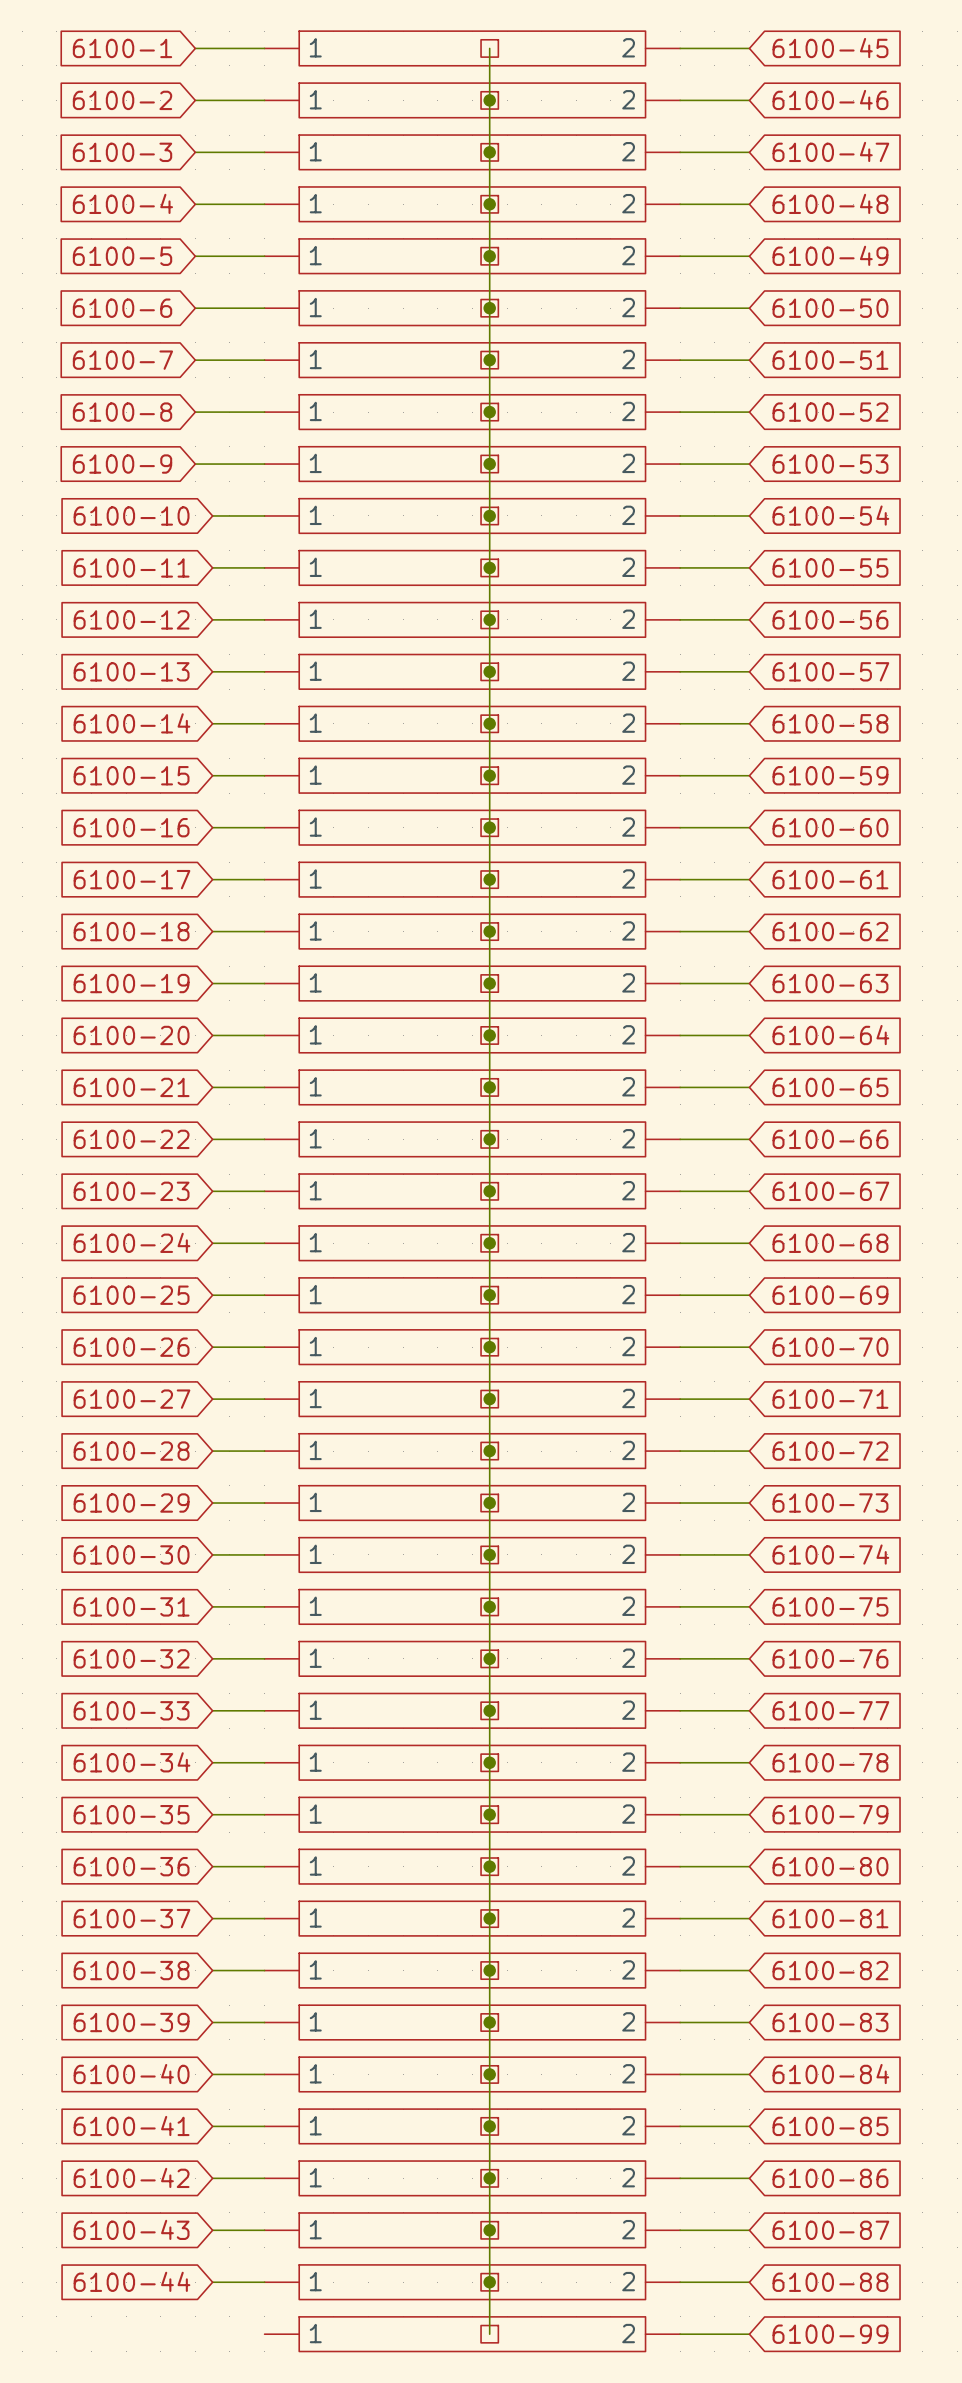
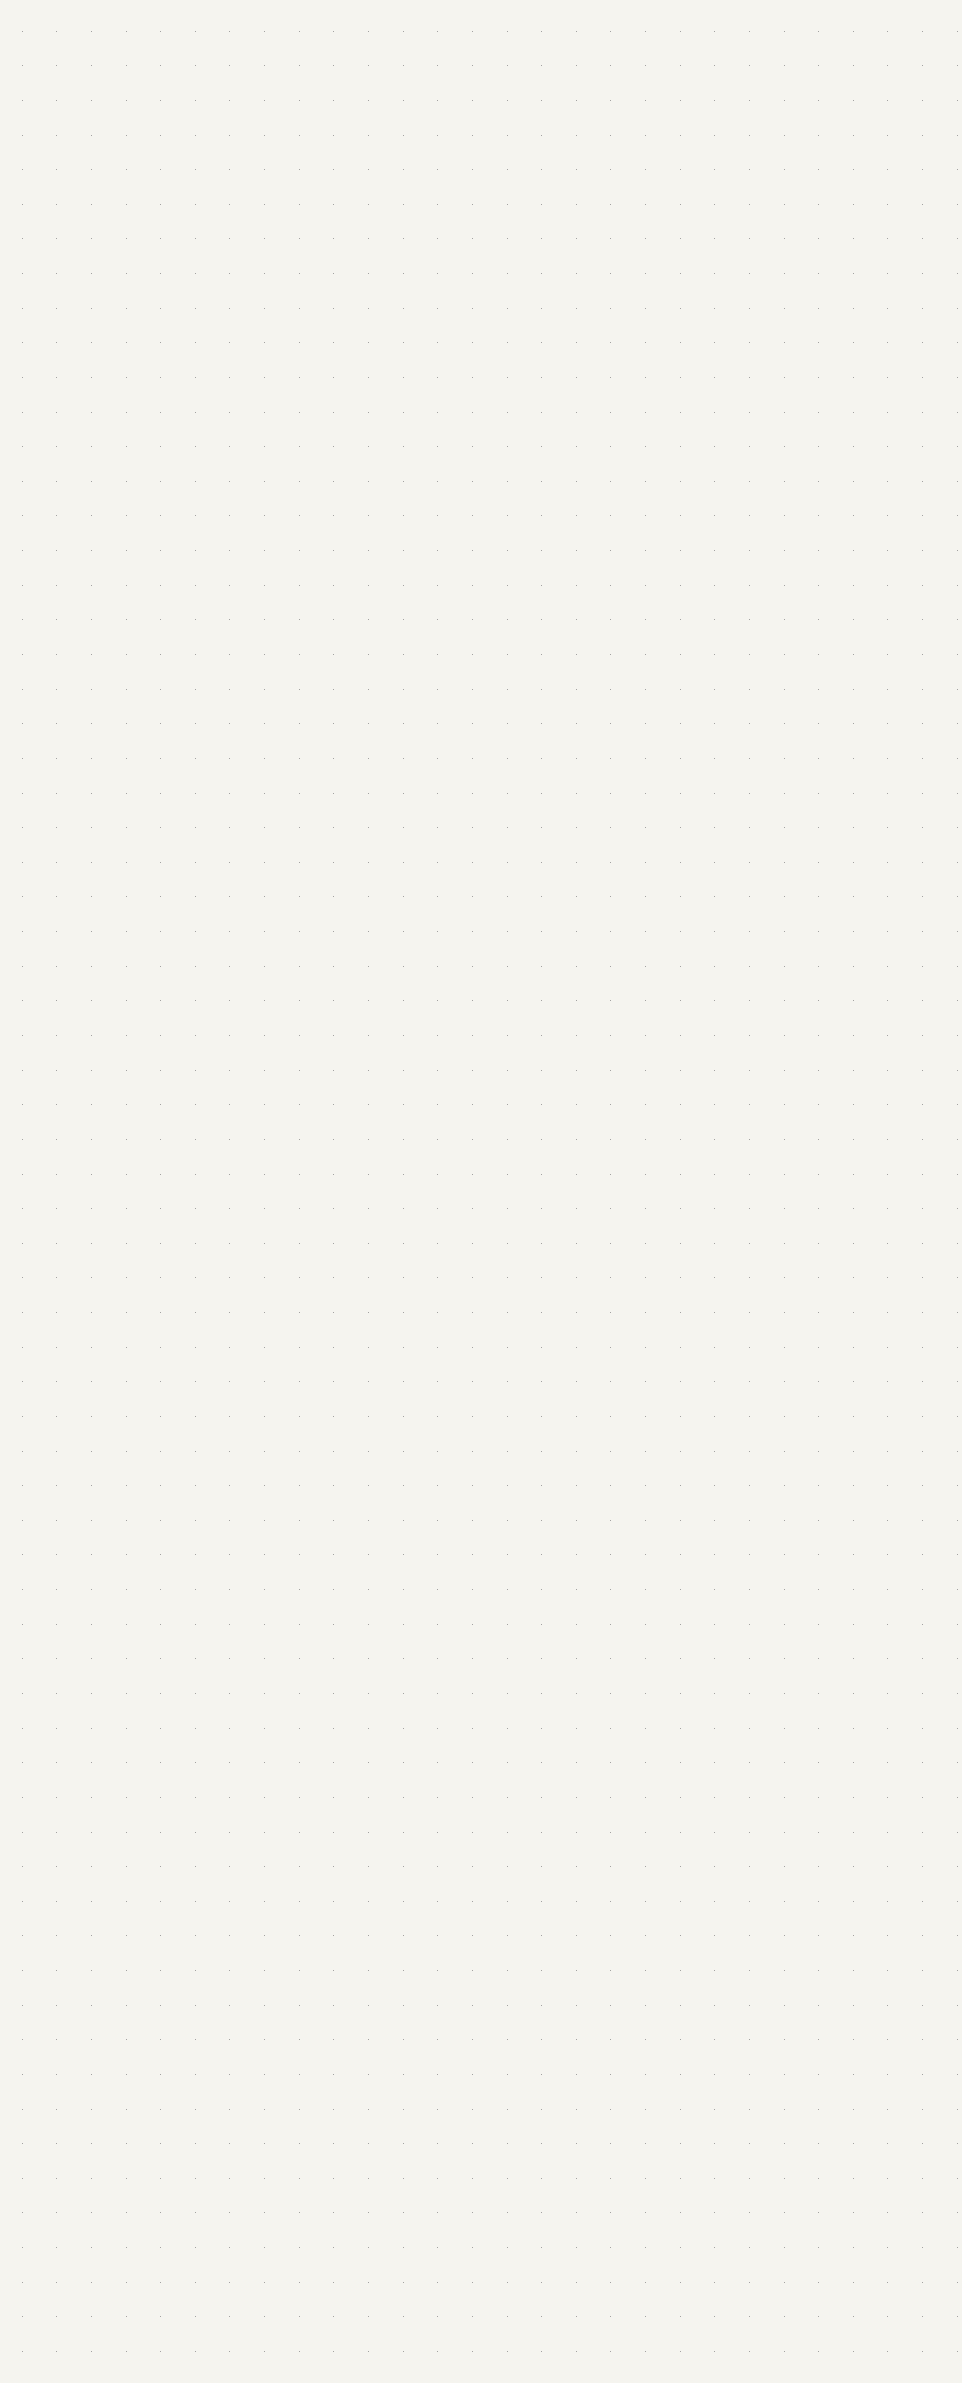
global label: 6100-1 (122, 48) -> none
wire: (195, 48) (264, 48) -> none
part: (472, 48) -> none
wire: (489, 48) (489, 2334) -> none
wire: (680, 48) (749, 48) -> none
global label: 6100-45 (830, 48) -> none
global label: 6100-46 (830, 99) -> none
global label: 6100-2 (122, 100) -> none
wire: (195, 100) (264, 100) -> none
part: (472, 100) -> none
junction: (489, 100) -> none
wire: (680, 100) (749, 100) -> none
global label: 6100-47 (830, 151) -> none
global label: 6100-3 (122, 152) -> none
wire: (195, 152) (264, 152) -> none
part: (472, 152) -> none
junction: (489, 152) -> none
wire: (680, 152) (749, 152) -> none
global label: 6100-4 (122, 203) -> none
global label: 6100-48 (830, 203) -> none
wire: (195, 204) (264, 204) -> none
part: (472, 204) -> none
junction: (489, 204) -> none
wire: (680, 204) (749, 204) -> none
global label: 6100-49 (830, 255) -> none
global label: 6100-5 (122, 256) -> none
wire: (195, 256) (264, 256) -> none
part: (472, 256) -> none
junction: (489, 256) -> none
wire: (680, 256) (749, 256) -> none
global label: 6100-6 (122, 308) -> none
wire: (195, 308) (264, 308) -> none
part: (472, 308) -> none
junction: (489, 308) -> none
wire: (680, 308) (749, 308) -> none
global label: 6100-50 (830, 308) -> none
global label: 6100-7 (122, 360) -> none
wire: (195, 360) (264, 360) -> none
part: (472, 360) -> none
junction: (489, 360) -> none
wire: (680, 360) (749, 360) -> none
global label: 6100-51 (830, 360) -> none
global label: 6100-8 (122, 412) -> none
wire: (195, 412) (264, 412) -> none
part: (472, 412) -> none
junction: (489, 412) -> none
wire: (680, 412) (749, 412) -> none
global label: 6100-52 (830, 412) -> none
global label: 6100-9 (122, 464) -> none
wire: (195, 464) (264, 464) -> none
part: (472, 464) -> none
junction: (489, 464) -> none
wire: (680, 464) (749, 464) -> none
global label: 6100-53 (830, 464) -> none
global label: 6100-10 (131, 515) -> none
wire: (212, 515) (264, 515) -> none
part: (472, 515) -> none
junction: (489, 515) -> none
wire: (680, 515) (749, 515) -> none
global label: 6100-54 (830, 515) -> none
global label: 6100-11 (131, 567) -> none
wire: (212, 567) (264, 567) -> none
part: (472, 567) -> none
junction: (489, 567) -> none
wire: (680, 567) (749, 567) -> none
global label: 6100-55 (830, 567) -> none
global label: 6100-12 (131, 619) -> none
wire: (212, 619) (264, 619) -> none
part: (472, 619) -> none
junction: (489, 619) -> none
wire: (680, 619) (749, 619) -> none
global label: 6100-56 (830, 619) -> none
global label: 6100-13 (131, 671) -> none
wire: (212, 671) (264, 671) -> none
part: (472, 671) -> none
junction: (489, 671) -> none
wire: (680, 671) (749, 671) -> none
global label: 6100-57 (830, 671) -> none
global label: 6100-14 (132, 723) -> none
wire: (212, 723) (264, 723) -> none
part: (472, 723) -> none
junction: (489, 723) -> none
wire: (680, 723) (749, 723) -> none
global label: 6100-58 (830, 723) -> none
global label: 6100-15 (131, 775) -> none
wire: (212, 775) (264, 775) -> none
part: (472, 775) -> none
junction: (489, 775) -> none
wire: (680, 775) (749, 775) -> none
global label: 6100-59 (830, 775) -> none
global label: 6100-16 (131, 827) -> none
wire: (212, 827) (264, 827) -> none
part: (472, 827) -> none
junction: (489, 827) -> none
wire: (680, 827) (749, 827) -> none
global label: 6100-60 (830, 827) -> none
global label: 6100-17 (132, 879) -> none
wire: (212, 879) (264, 879) -> none
part: (472, 879) -> none
junction: (489, 879) -> none
wire: (680, 879) (749, 879) -> none
global label: 6100-61 (830, 879) -> none
global label: 6100-18 (131, 931) -> none
wire: (212, 931) (264, 931) -> none
part: (472, 931) -> none
junction: (489, 931) -> none
wire: (680, 931) (749, 931) -> none
global label: 6100-62 (830, 931) -> none
global label: 6100-19 (131, 983) -> none
wire: (212, 983) (264, 983) -> none
part: (472, 983) -> none
junction: (489, 983) -> none
wire: (680, 983) (749, 983) -> none
global label: 6100-63 (830, 983) -> none
global label: 6100-20 (131, 1035) -> none
wire: (212, 1035) (264, 1035) -> none
part: (472, 1035) -> none
junction: (489, 1035) -> none
wire: (680, 1035) (749, 1035) -> none
global label: 6100-64 (830, 1035) -> none
global label: 6100-21 (131, 1087) -> none
wire: (212, 1087) (264, 1087) -> none
part: (472, 1087) -> none
junction: (489, 1087) -> none
wire: (680, 1087) (749, 1087) -> none
global label: 6100-65 (830, 1087) -> none
global label: 6100-22 (131, 1139) -> none
wire: (212, 1139) (264, 1139) -> none
part: (472, 1139) -> none
junction: (489, 1139) -> none
wire: (680, 1139) (749, 1139) -> none
global label: 6100-66 (830, 1139) -> none
global label: 6100-23 (131, 1191) -> none
wire: (212, 1191) (264, 1191) -> none
part: (472, 1191) -> none
junction: (489, 1191) -> none
wire: (680, 1191) (749, 1191) -> none
global label: 6100-67 (830, 1191) -> none
global label: 6100-24 (132, 1242) -> none
wire: (212, 1243) (264, 1243) -> none
part: (472, 1243) -> none
junction: (489, 1243) -> none
wire: (680, 1243) (749, 1243) -> none
global label: 6100-68 (830, 1243) -> none
global label: 6100-25 (131, 1295) -> none
wire: (212, 1295) (264, 1295) -> none
part: (472, 1295) -> none
junction: (489, 1295) -> none
wire: (680, 1295) (749, 1295) -> none
global label: 6100-69 (830, 1295) -> none
global label: 6100-26 (131, 1347) -> none
wire: (212, 1347) (264, 1347) -> none
part: (472, 1347) -> none
junction: (489, 1347) -> none
wire: (680, 1347) (749, 1347) -> none
global label: 6100-70 (830, 1347) -> none
global label: 6100-27 (132, 1399) -> none
wire: (212, 1399) (264, 1399) -> none
part: (472, 1399) -> none
junction: (489, 1399) -> none
wire: (680, 1399) (749, 1399) -> none
global label: 6100-71 (830, 1399) -> none
global label: 6100-28 (131, 1451) -> none
wire: (212, 1451) (264, 1451) -> none
part: (472, 1451) -> none
junction: (489, 1451) -> none
wire: (680, 1451) (749, 1451) -> none
global label: 6100-72 (830, 1451) -> none
global label: 6100-29 (131, 1503) -> none
wire: (212, 1503) (264, 1503) -> none
part: (472, 1503) -> none
junction: (489, 1503) -> none
wire: (680, 1503) (749, 1503) -> none
global label: 6100-73 (830, 1503) -> none
global label: 6100-30 (131, 1554) -> none
wire: (212, 1554) (264, 1554) -> none
part: (472, 1554) -> none
junction: (489, 1554) -> none
wire: (680, 1554) (749, 1554) -> none
global label: 6100-74 (830, 1554) -> none
global label: 6100-31 (131, 1606) -> none
wire: (212, 1606) (264, 1606) -> none
part: (472, 1606) -> none
junction: (489, 1606) -> none
wire: (680, 1606) (749, 1606) -> none
global label: 6100-75 (830, 1606) -> none
global label: 6100-32 (131, 1658) -> none
wire: (212, 1658) (264, 1658) -> none
part: (472, 1658) -> none
junction: (489, 1658) -> none
wire: (680, 1658) (749, 1658) -> none
global label: 6100-76 (830, 1658) -> none
global label: 6100-33 (131, 1710) -> none
wire: (212, 1710) (264, 1710) -> none
part: (472, 1710) -> none
junction: (489, 1710) -> none
wire: (680, 1710) (749, 1710) -> none
global label: 6100-77 (830, 1710) -> none
global label: 6100-34 (132, 1762) -> none
wire: (212, 1762) (264, 1762) -> none
part: (472, 1762) -> none
junction: (489, 1762) -> none
wire: (680, 1762) (749, 1762) -> none
global label: 6100-78 (830, 1762) -> none
global label: 6100-35 (131, 1814) -> none
wire: (212, 1814) (264, 1814) -> none
part: (472, 1814) -> none
junction: (489, 1814) -> none
wire: (680, 1814) (749, 1814) -> none
global label: 6100-79 (830, 1814) -> none
global label: 6100-36 (131, 1866) -> none
wire: (212, 1866) (264, 1866) -> none
part: (472, 1866) -> none
junction: (489, 1866) -> none
wire: (680, 1866) (749, 1866) -> none
global label: 6100-80 (830, 1866) -> none
global label: 6100-37 (132, 1918) -> none
wire: (212, 1918) (264, 1918) -> none
part: (472, 1918) -> none
junction: (489, 1918) -> none
wire: (680, 1918) (749, 1918) -> none
global label: 6100-81 (830, 1918) -> none
global label: 6100-38 (131, 1970) -> none
wire: (212, 1970) (264, 1970) -> none
part: (472, 1970) -> none
junction: (489, 1970) -> none
wire: (680, 1970) (749, 1970) -> none
global label: 6100-82 (830, 1970) -> none
global label: 6100-39 (131, 2022) -> none
wire: (212, 2022) (264, 2022) -> none
part: (472, 2022) -> none
junction: (489, 2022) -> none
wire: (680, 2022) (749, 2022) -> none
global label: 6100-83 (830, 2022) -> none
global label: 6100-40 (131, 2074) -> none
wire: (212, 2074) (264, 2074) -> none
part: (472, 2074) -> none
junction: (489, 2074) -> none
wire: (680, 2074) (749, 2074) -> none
global label: 6100-84 (830, 2074) -> none
global label: 6100-41 (131, 2125) -> none
wire: (212, 2126) (264, 2126) -> none
part: (472, 2126) -> none
junction: (489, 2126) -> none
wire: (680, 2126) (749, 2126) -> none
global label: 6100-85 (830, 2126) -> none
global label: 6100-42 (131, 2177) -> none
wire: (212, 2178) (264, 2178) -> none
part: (472, 2178) -> none
junction: (489, 2178) -> none
wire: (680, 2178) (749, 2178) -> none
global label: 6100-86 (830, 2178) -> none
global label: 6100-43 (131, 2229) -> none
wire: (212, 2230) (264, 2230) -> none
part: (472, 2230) -> none
junction: (489, 2230) -> none
wire: (680, 2230) (749, 2230) -> none
global label: 6100-87 (830, 2230) -> none
global label: 6100-44 (132, 2281) -> none
wire: (212, 2282) (264, 2282) -> none
part: (472, 2282) -> none
junction: (489, 2282) -> none
wire: (680, 2282) (749, 2282) -> none
global label: 6100-88 (830, 2282) -> none
part: (472, 2334) -> none
wire: (680, 2334) (749, 2334) -> none
global label: 6100-99 (830, 2334) -> none

